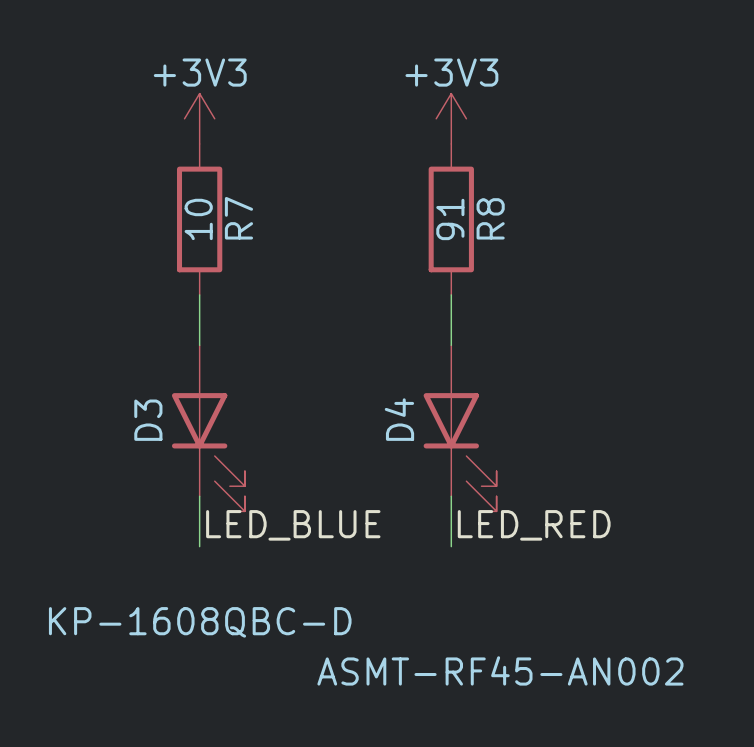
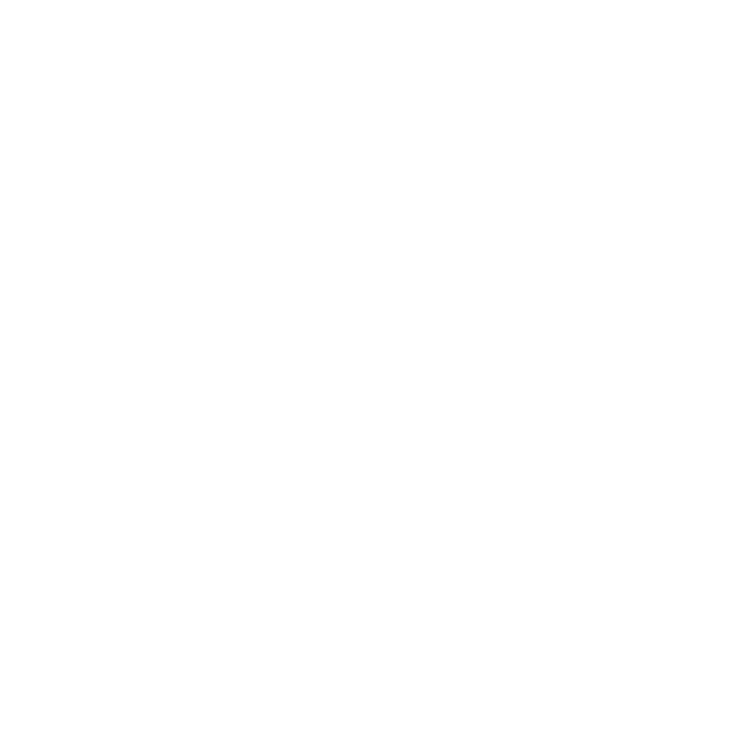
power symbol: +3V3 (199, 118) -> none
power symbol: +3V3 (451, 118) -> none
R7: 10 (199, 219) -> none
R8: 91 (451, 219) -> none
wire: (199, 294) (199, 345) -> none
wire: (451, 294) (451, 345) -> none
D3: KP-1608QBC-D (208, 428) -> none
D4: ASMT-RF45-AN002 (460, 428) -> none
wire: (199, 496) (199, 546) -> none
wire: (451, 496) (451, 546) -> none
label: LED_BLUE (293, 525) -> none
label: LED_RED (534, 525) -> none

